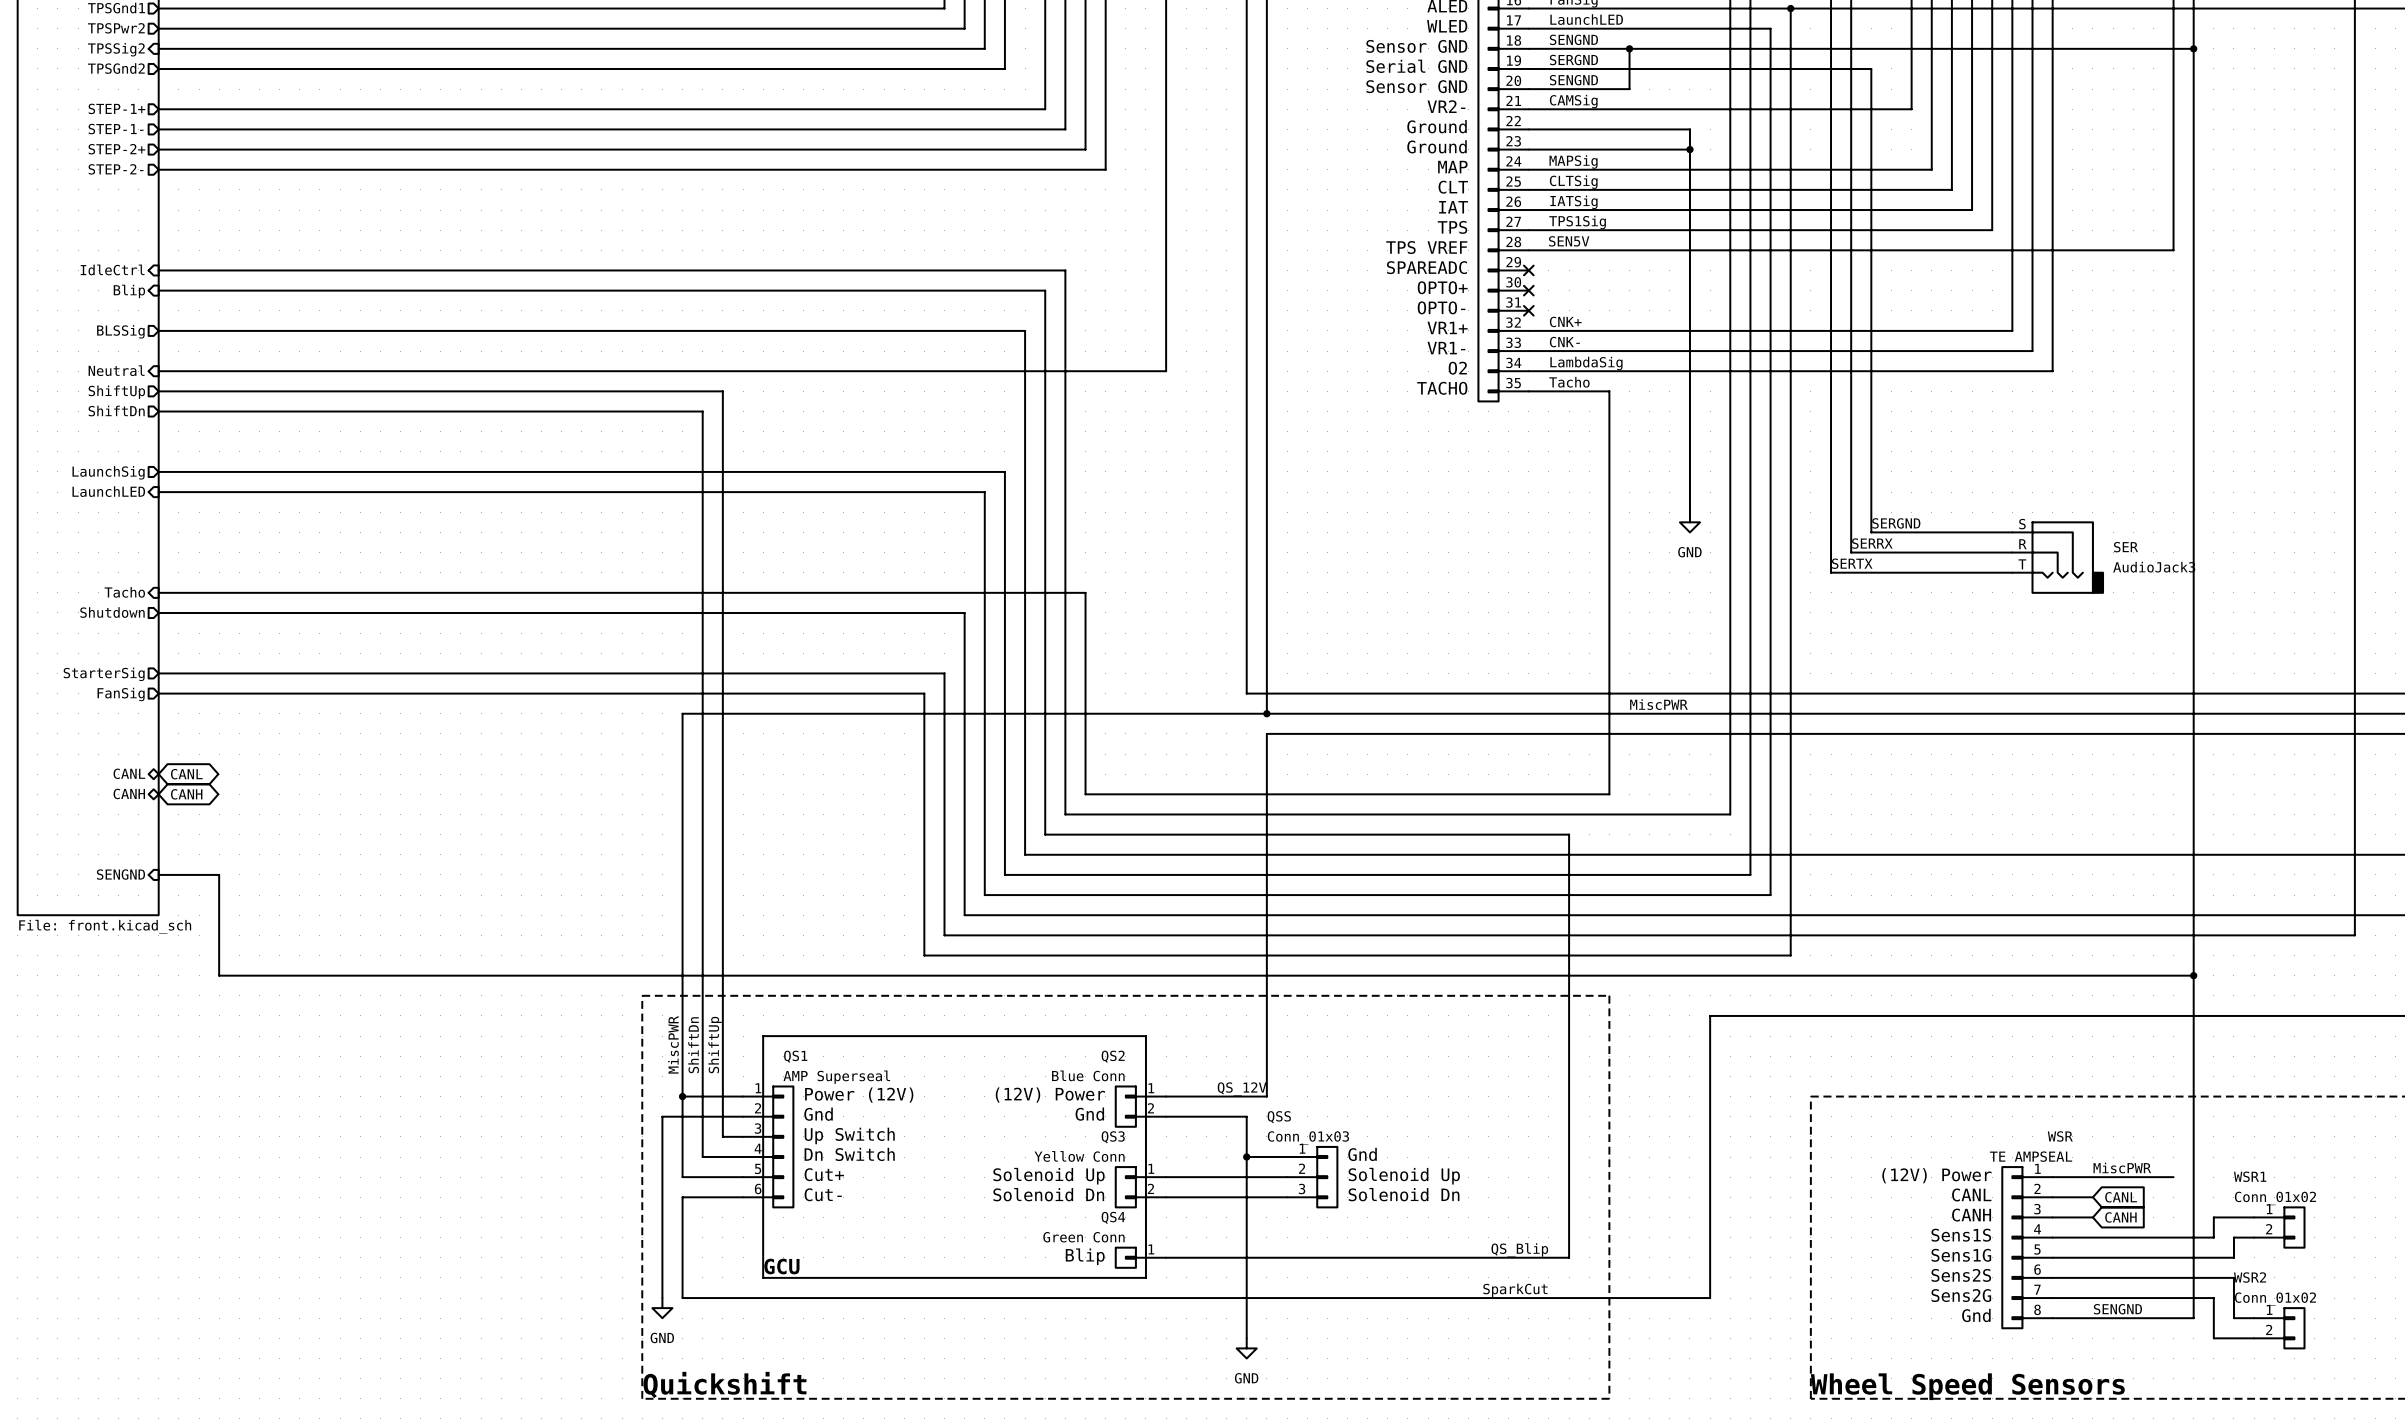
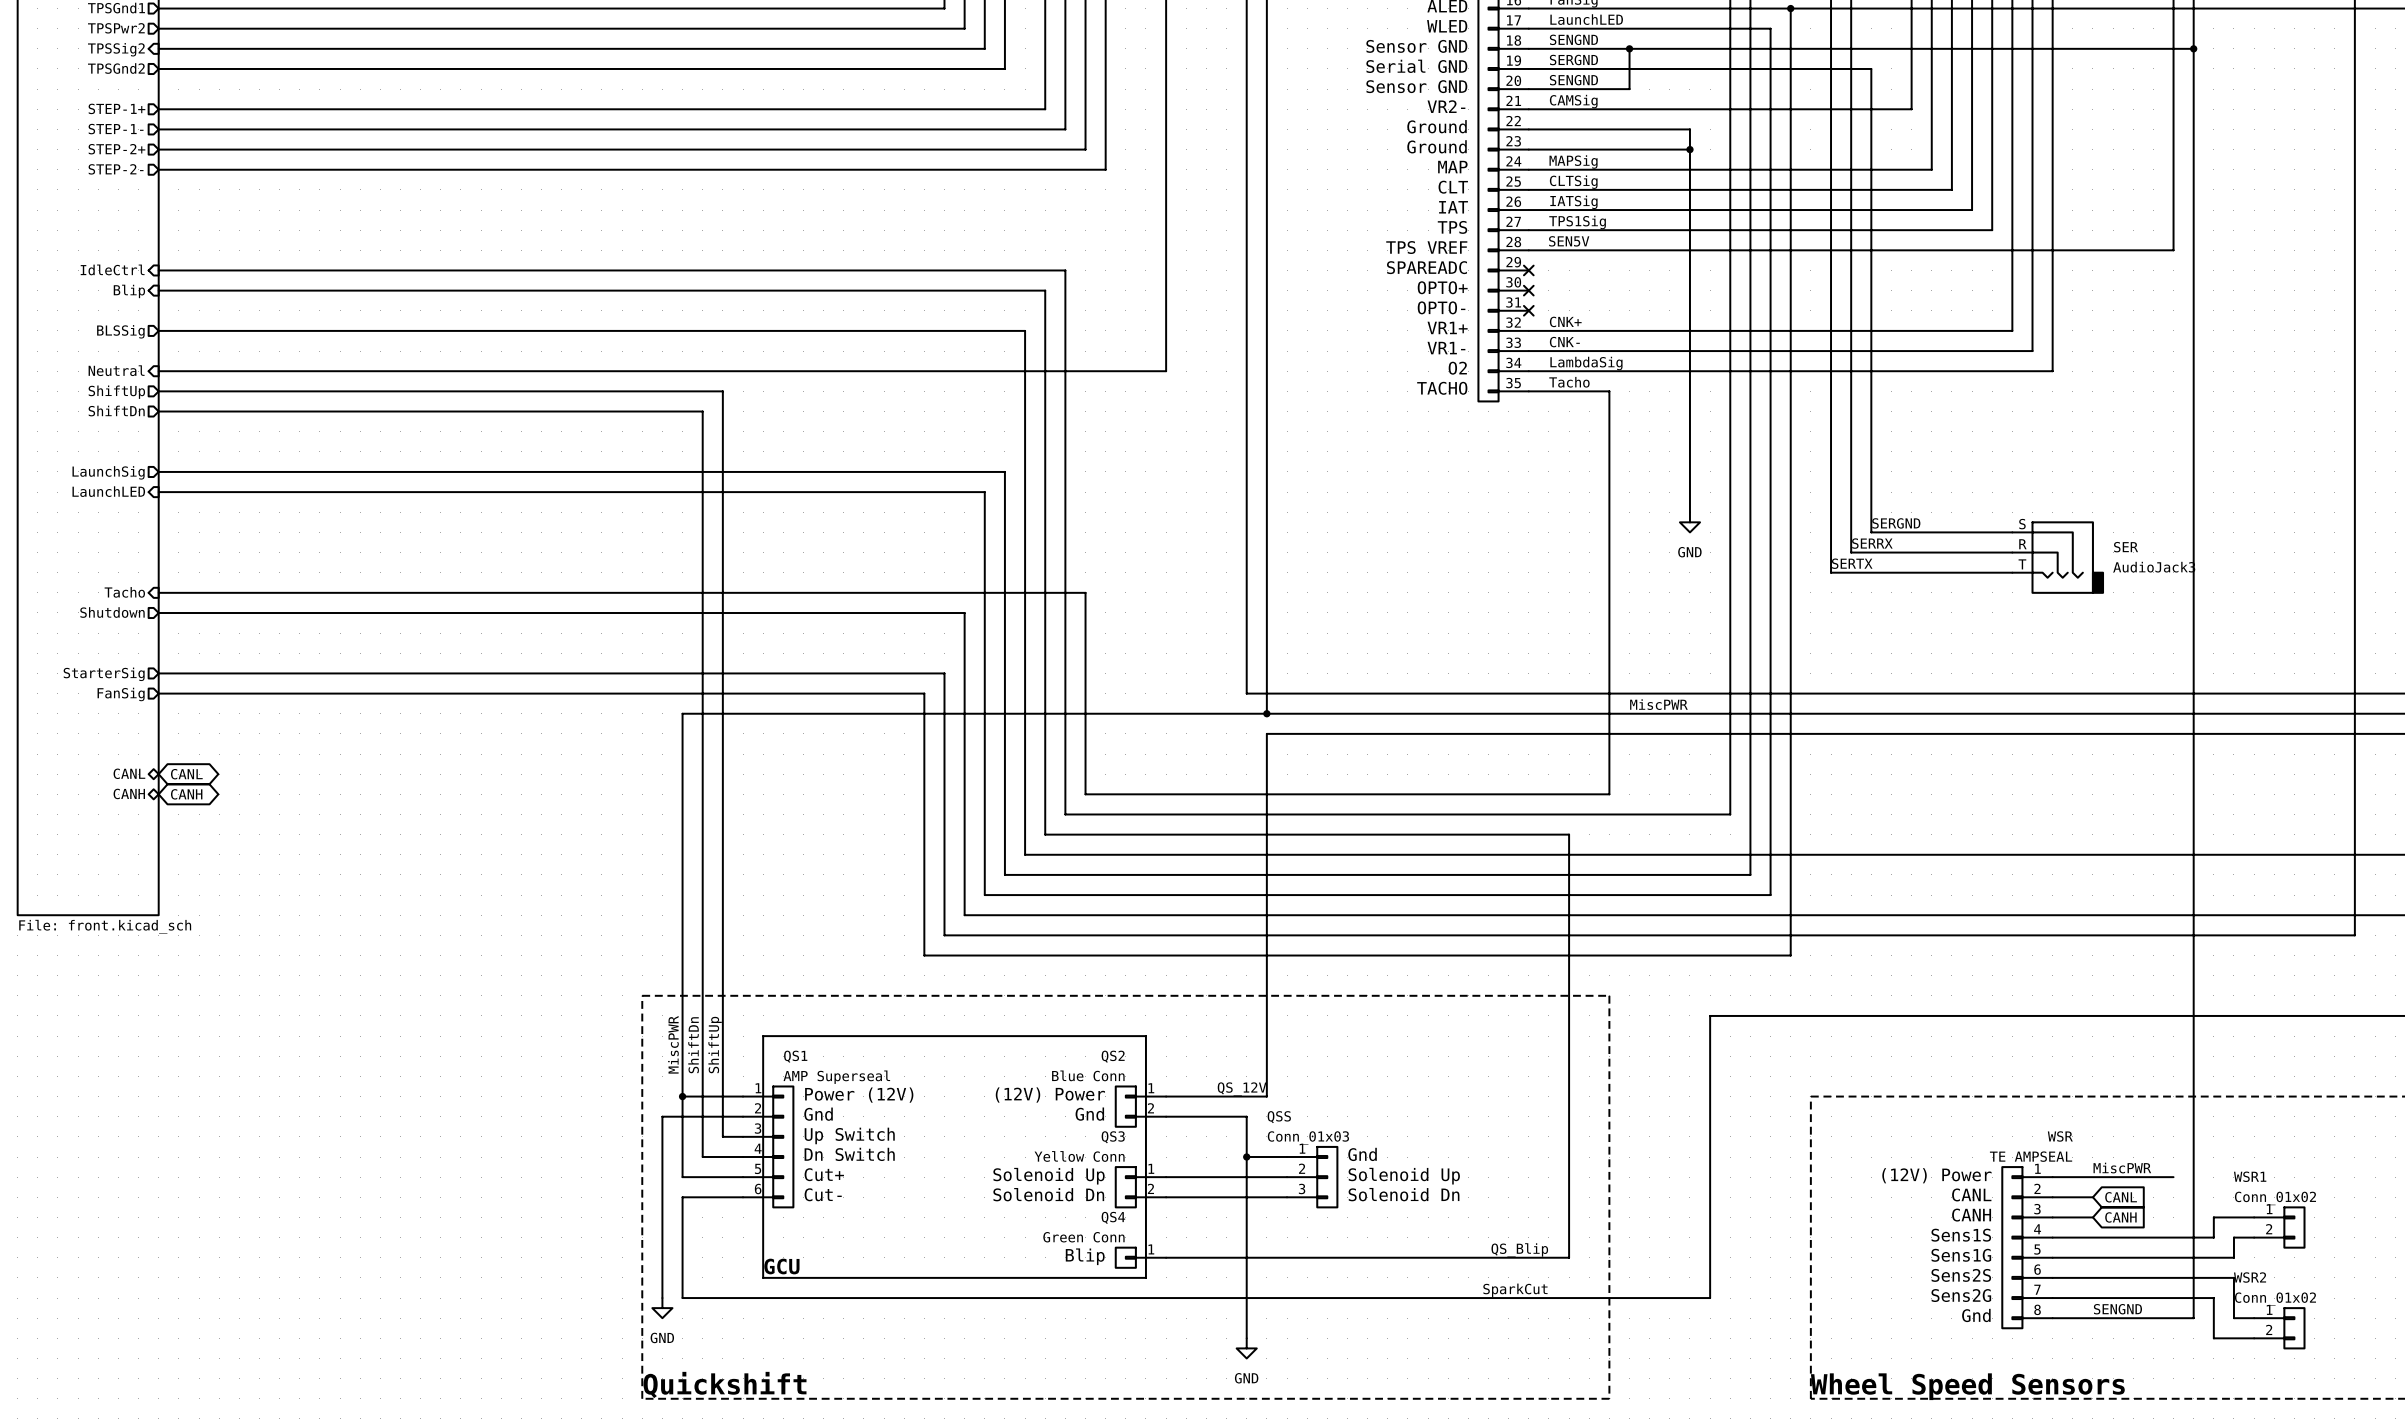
sheet pin: SENGND (120, 874) -> none
wire: (158, 874) (219, 874) (219, 975) (2193, 975) -> none
junction: (2193, 975) -> none

